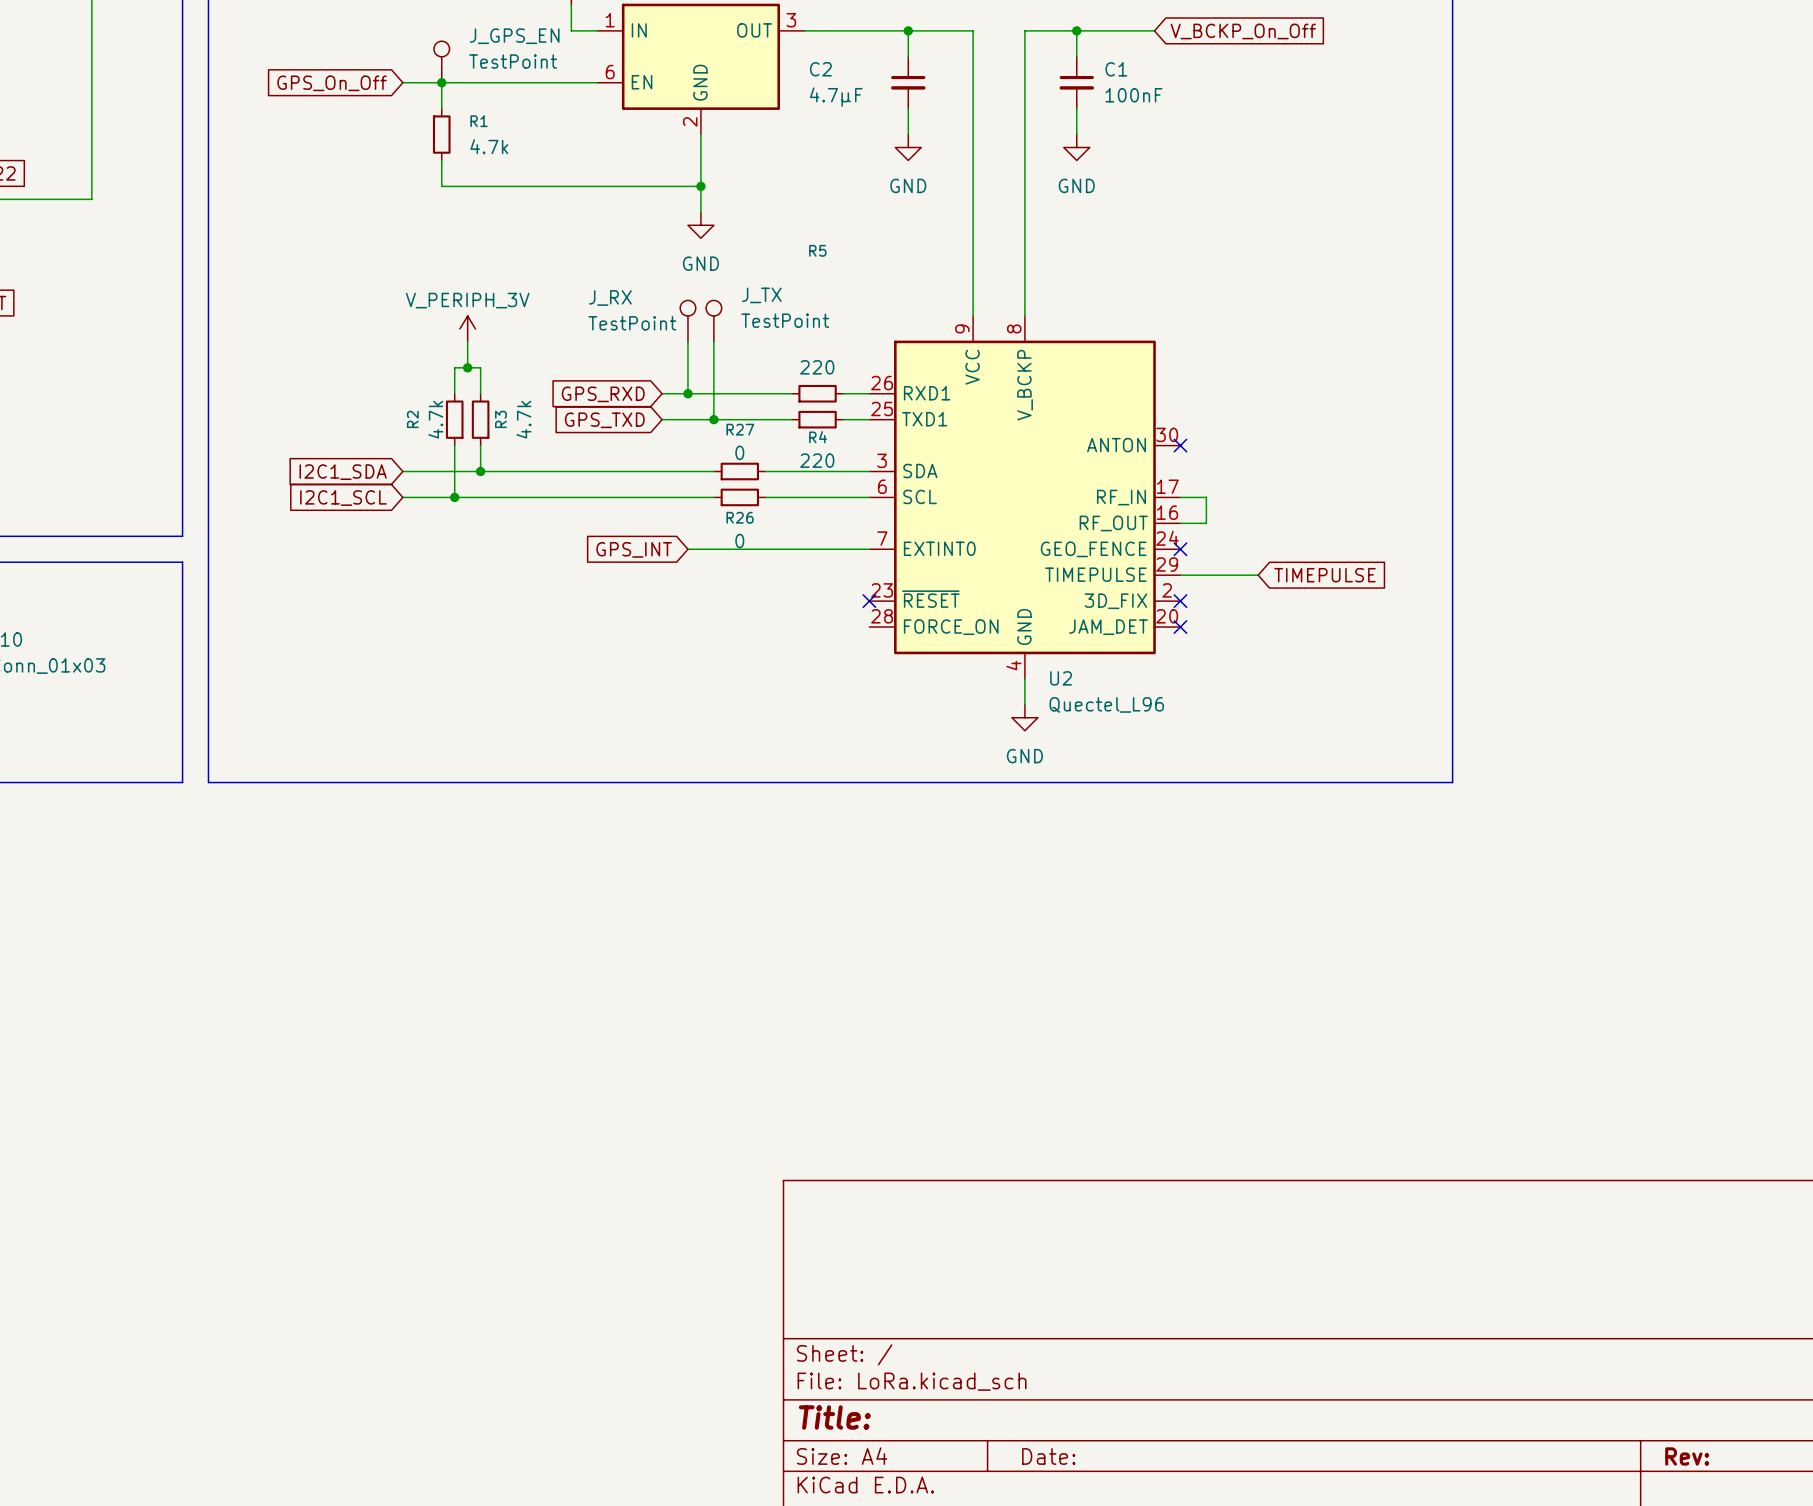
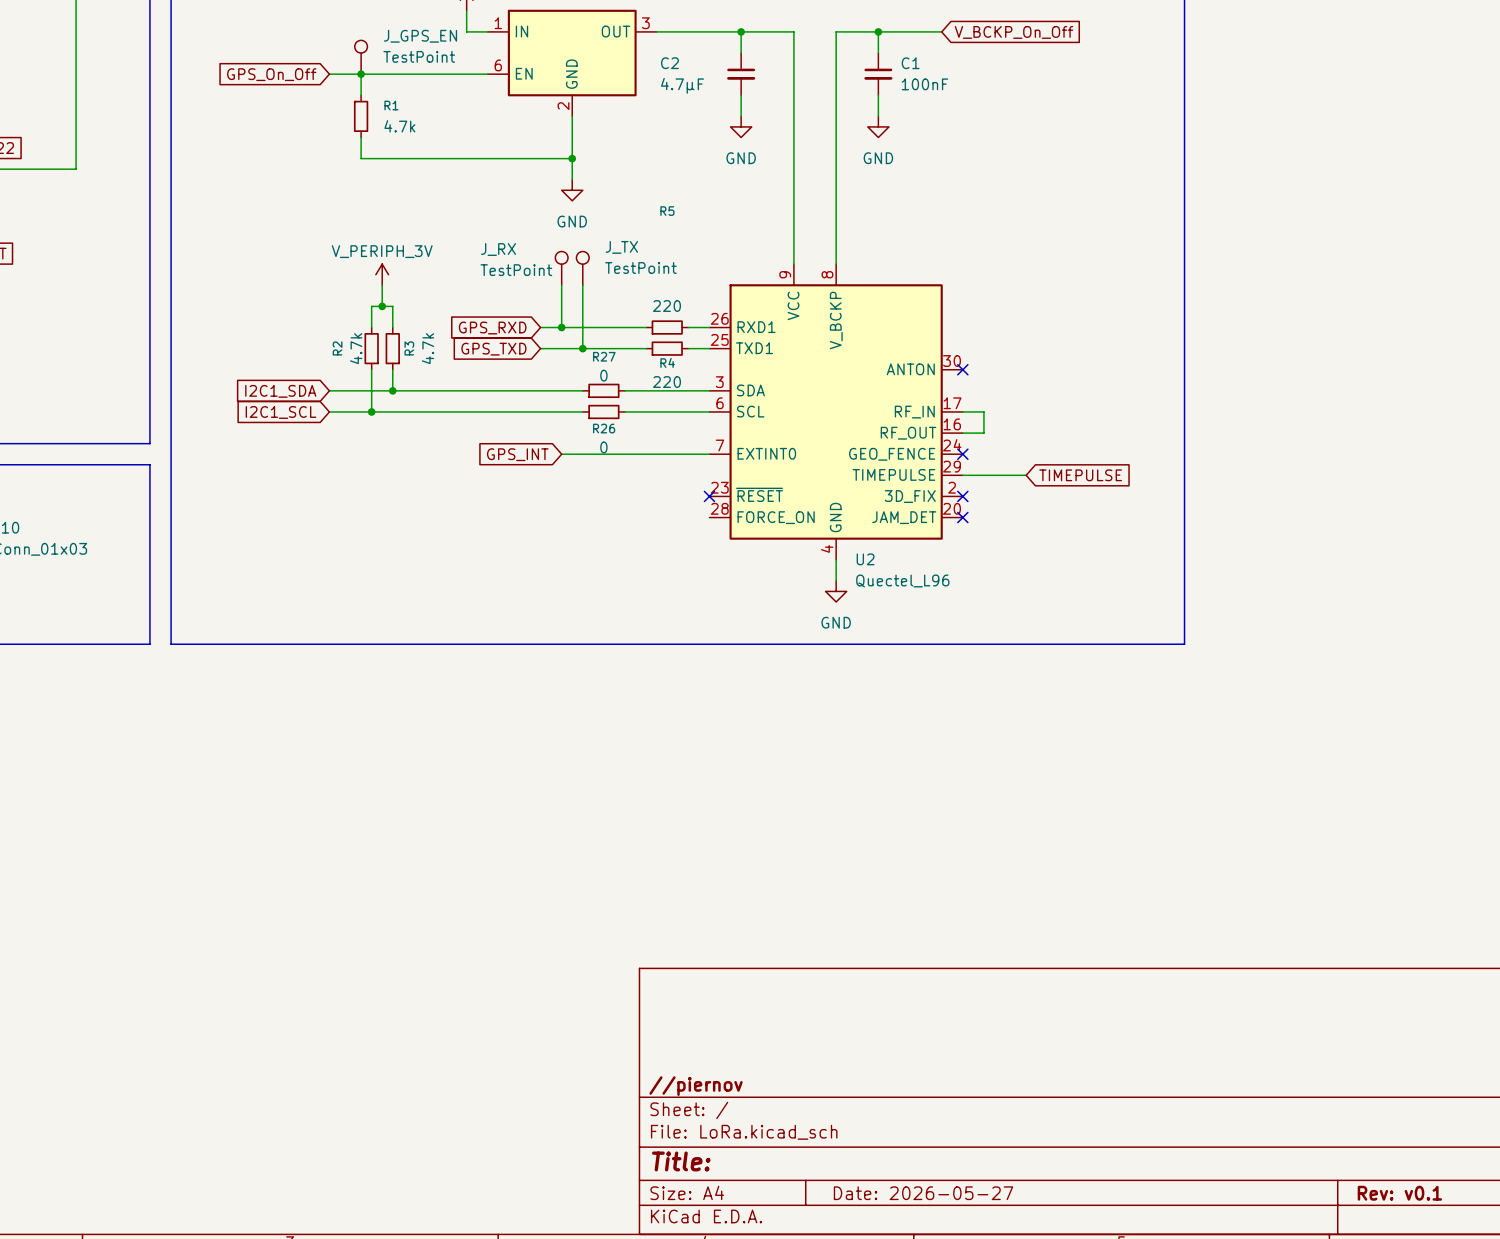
title block: none -> //piernov (696, 1086)
title block: Date: (1048, 1456) -> Date: 2026-05-27 (923, 1193)
title block: Rev: (1687, 1456) -> Rev: v0.1 (1399, 1193)

